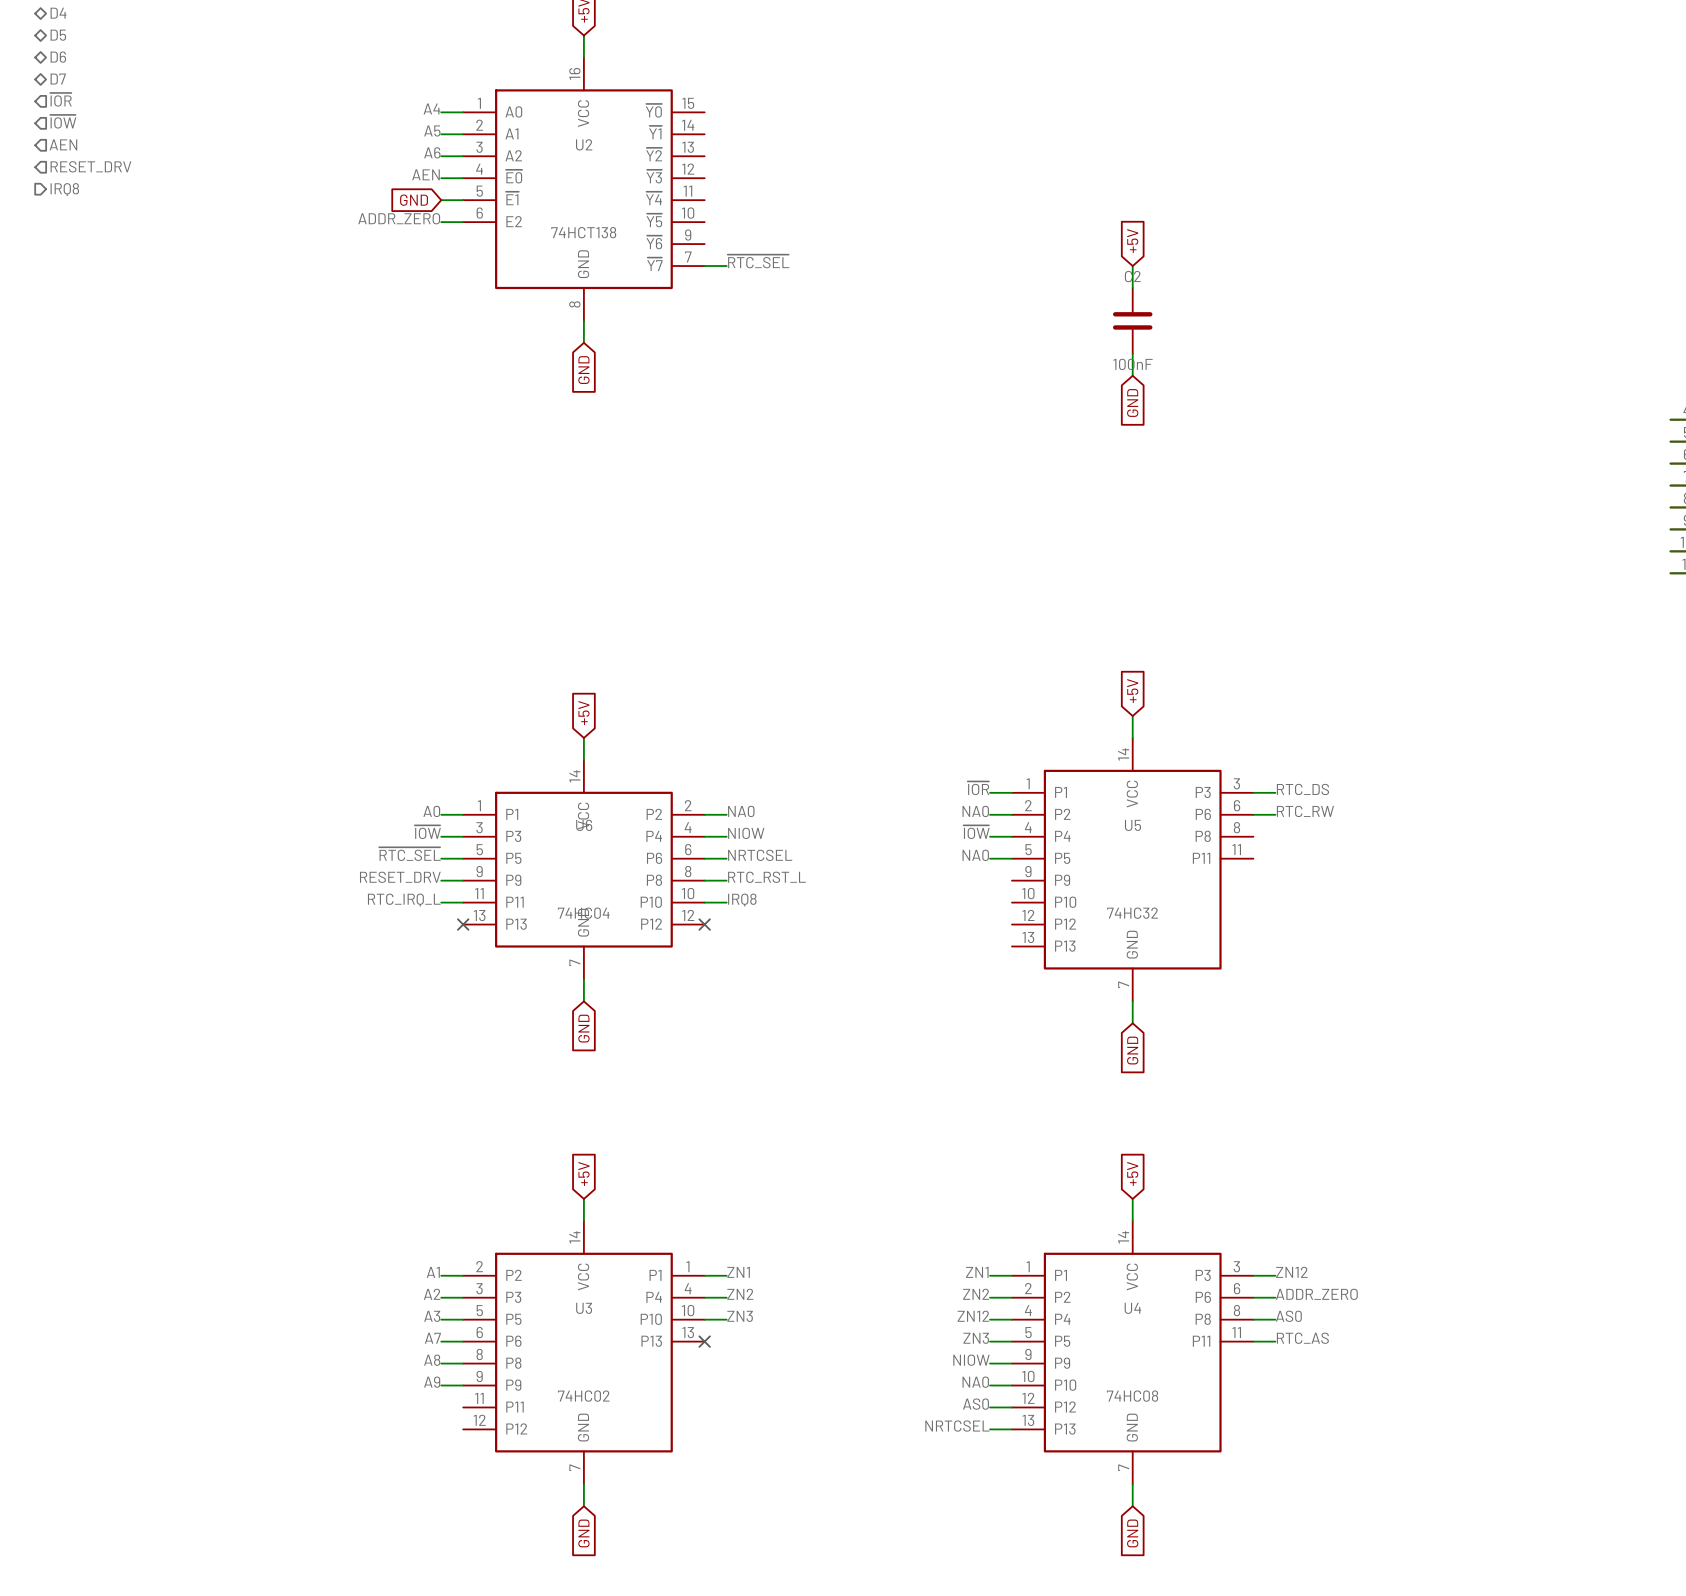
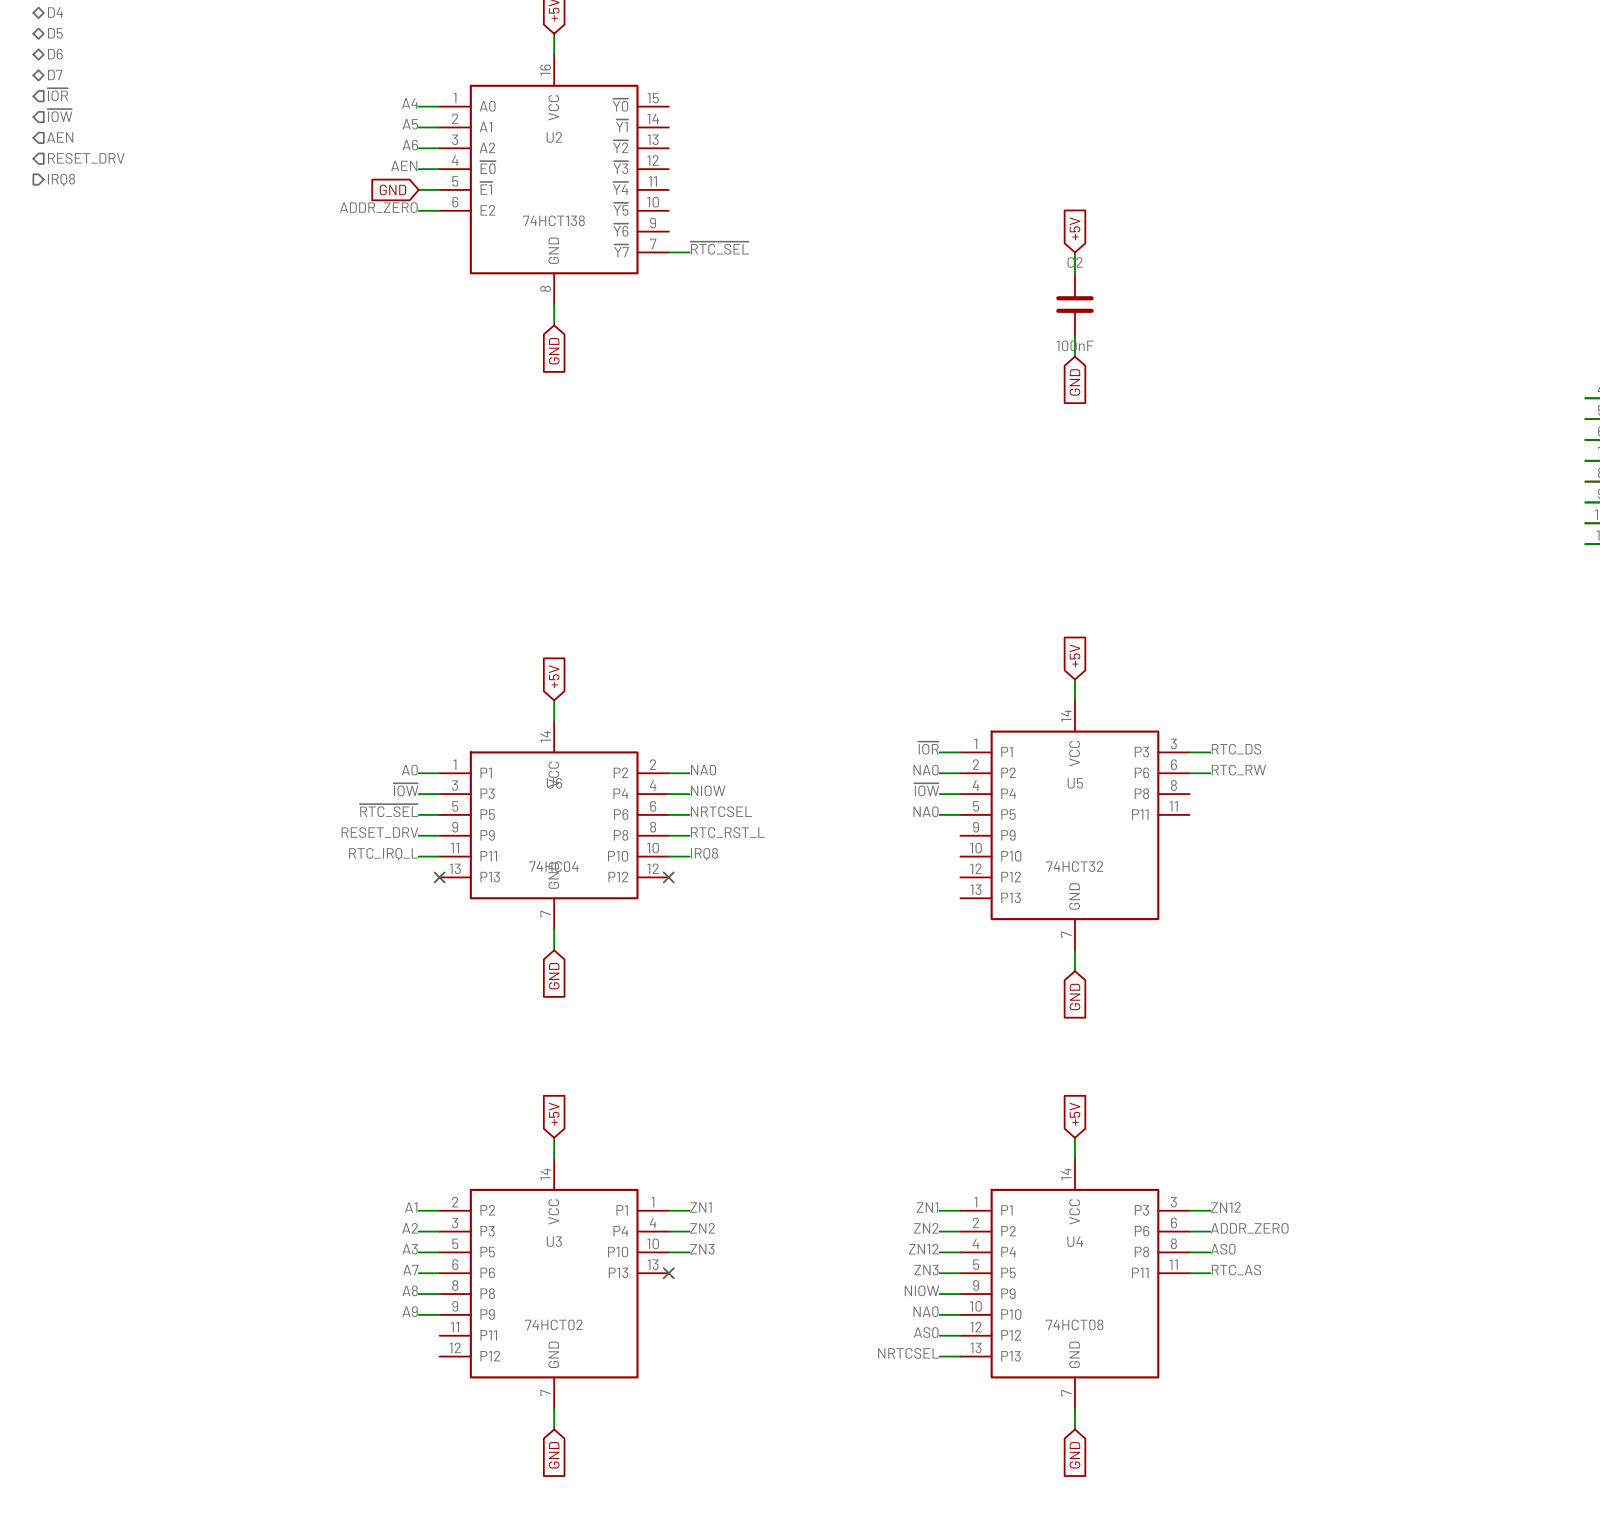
U5 value: 74HC32 (1132, 913) -> 74HCT32 (1074, 866)
U3 value: 74HC02 (583, 1396) -> 74HCT02 (554, 1324)
U4 value: 74HC08 (1132, 1396) -> 74HCT08 (1074, 1324)

